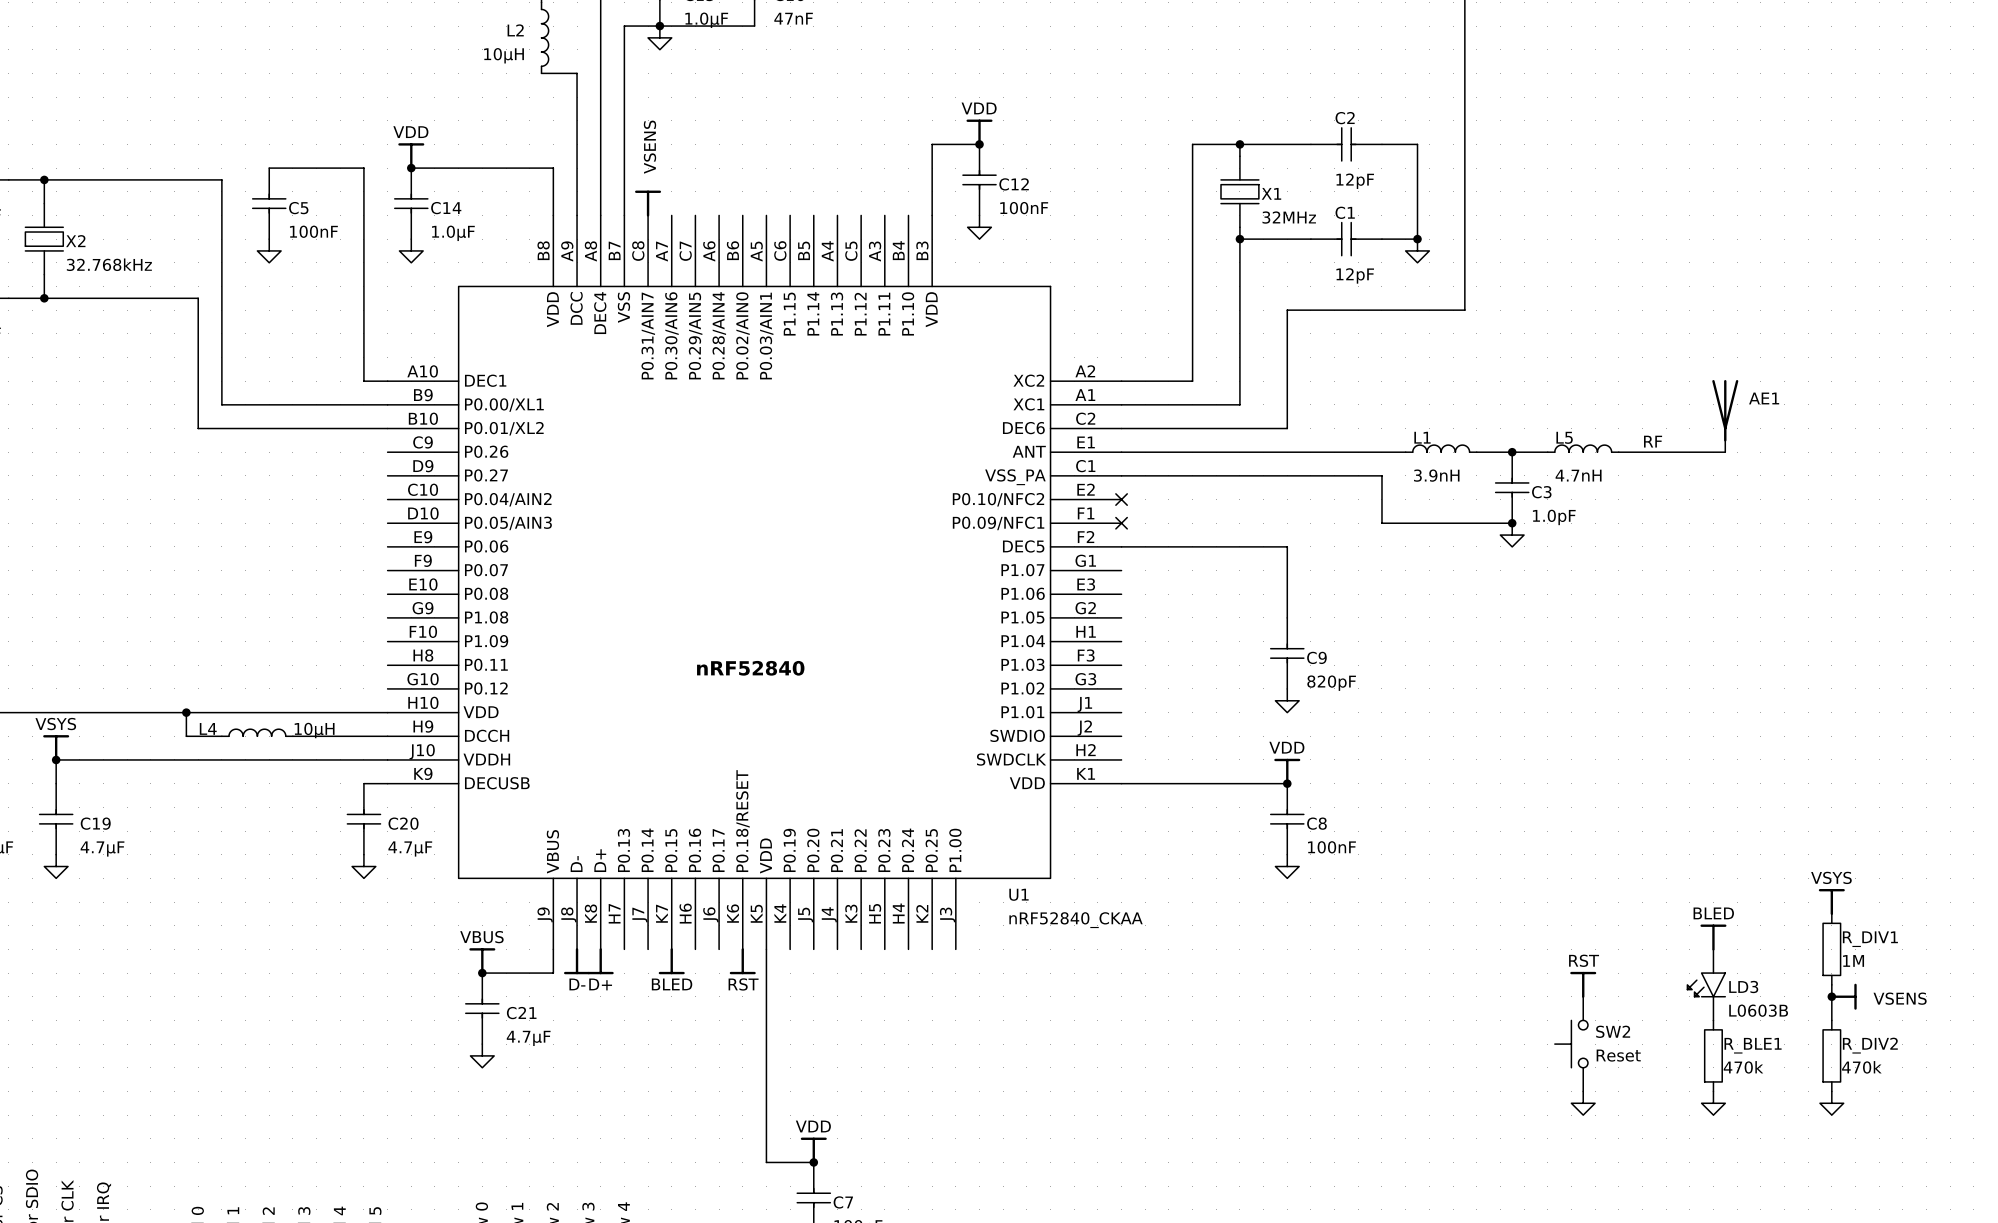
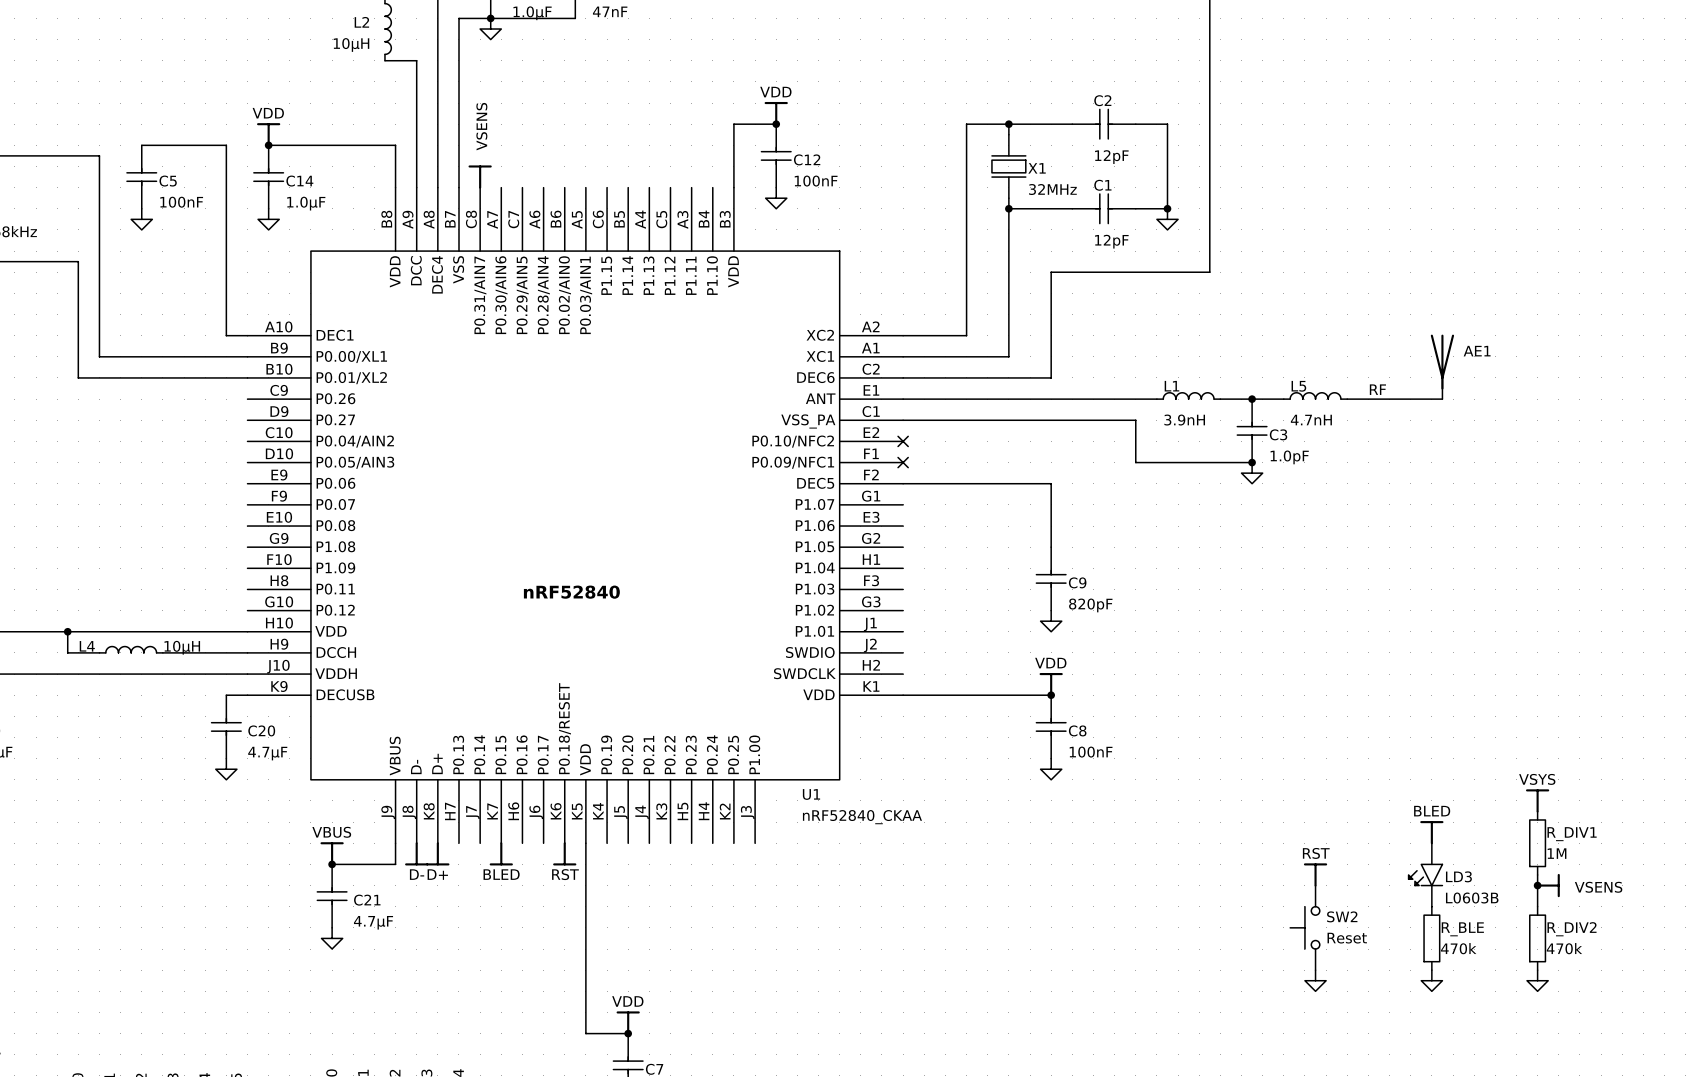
R_BLE1 name: R_BLE1 (1753, 1045) -> R_BLE (1462, 929)

